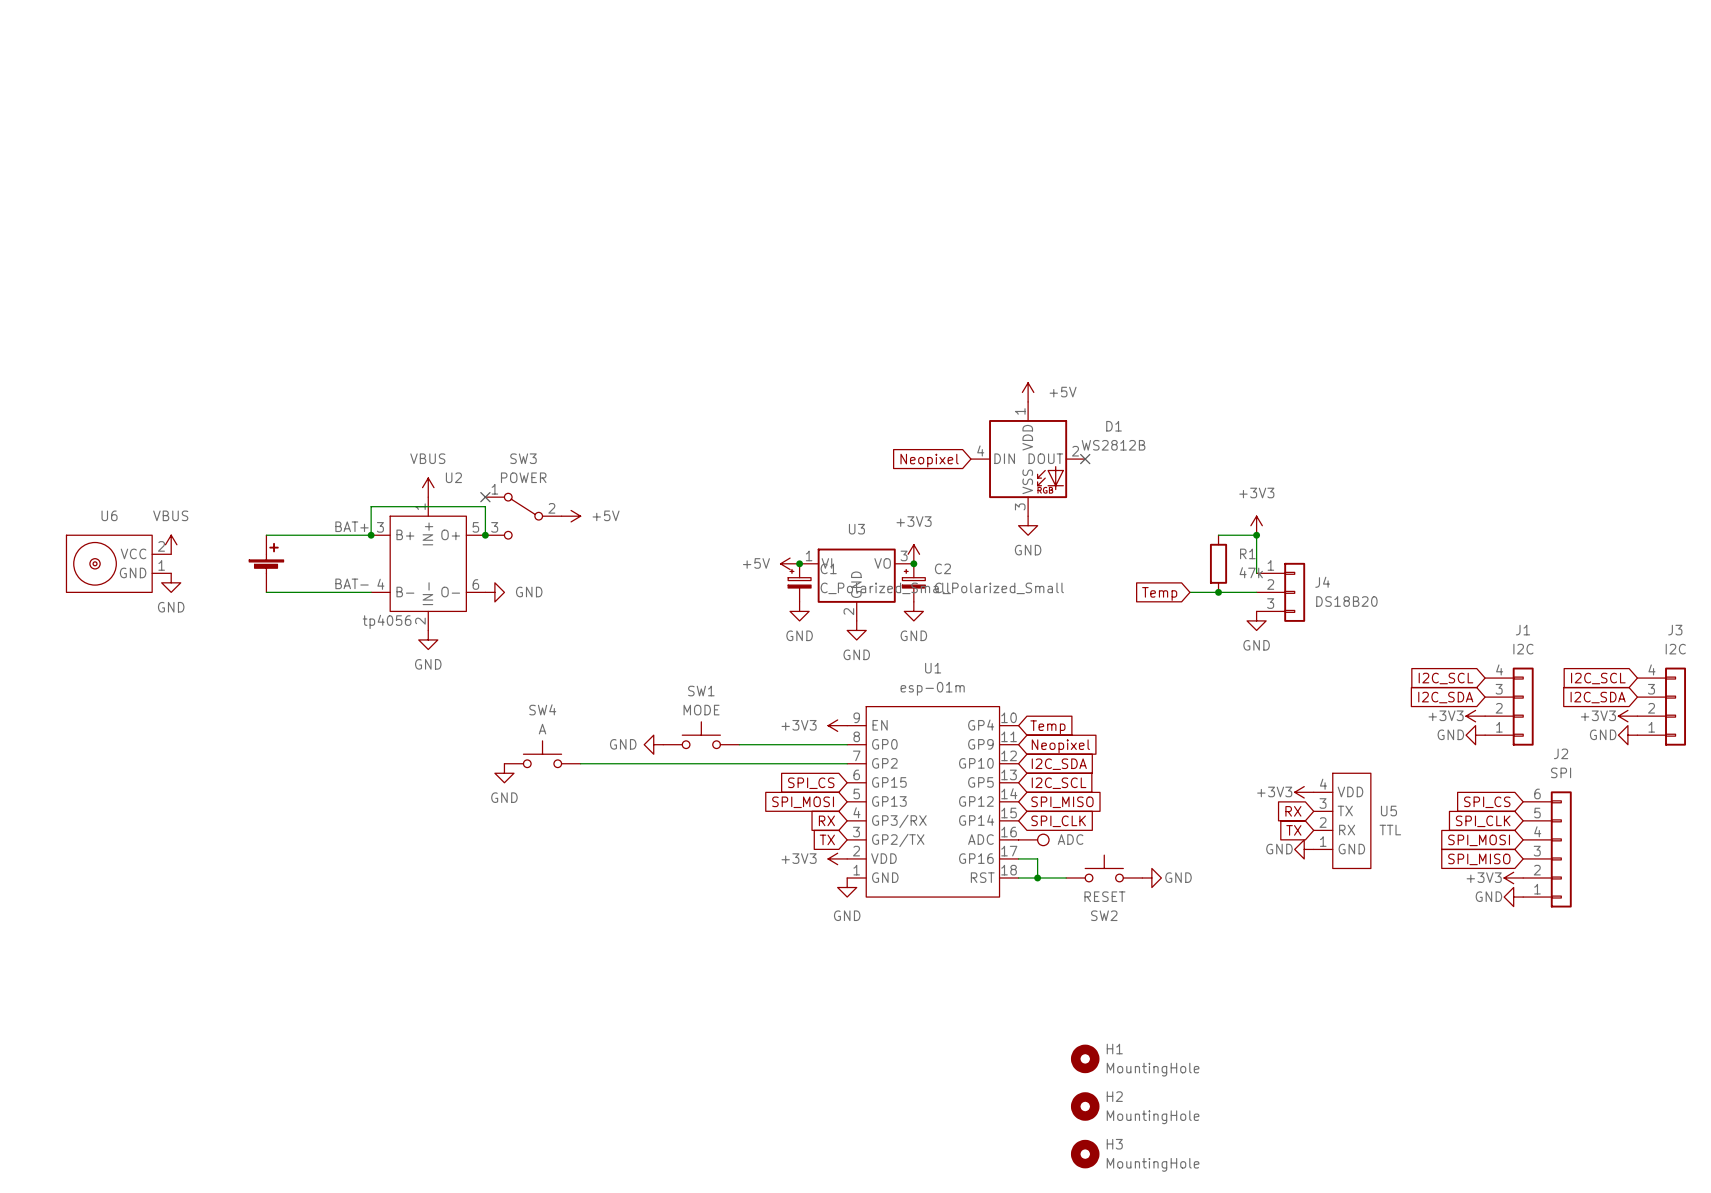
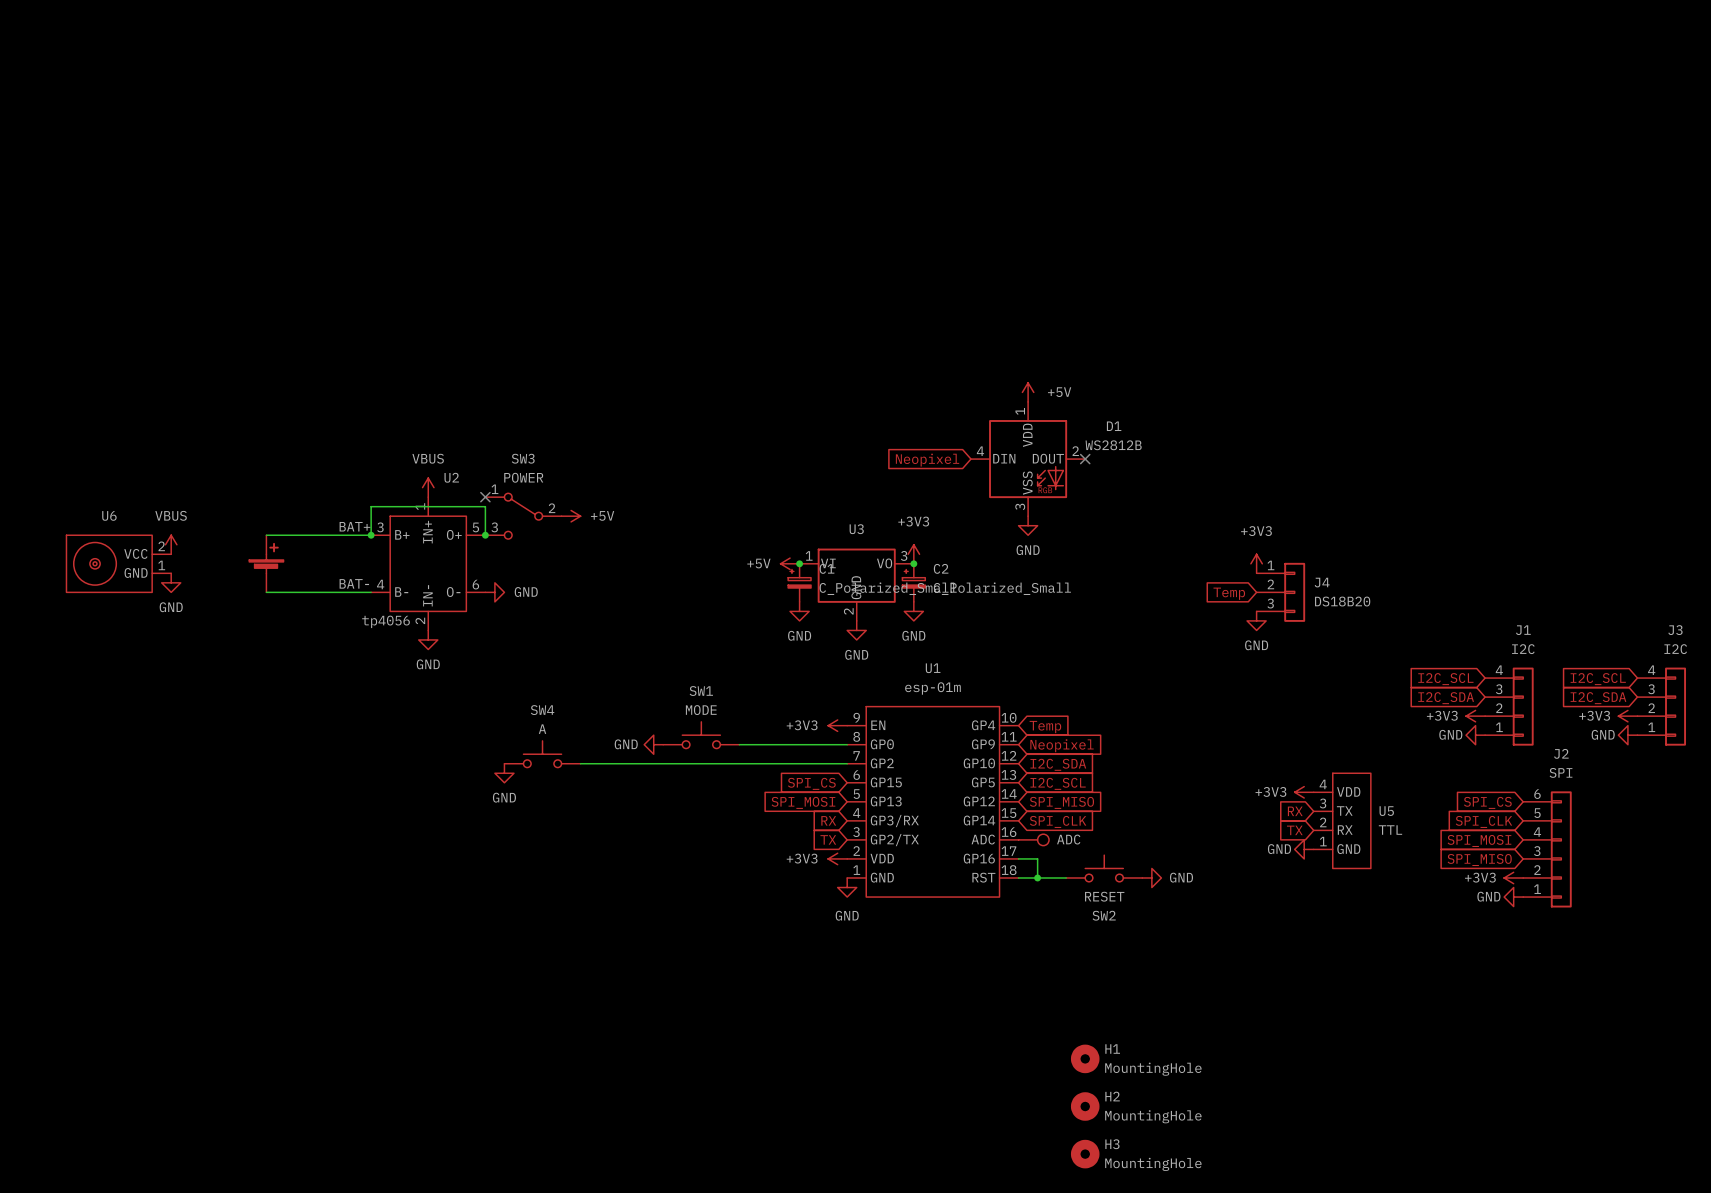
power symbol position: +3V3 (1256, 525) -> +3V3 (1256, 563)
wire: (1218, 535) (1256, 535) (1256, 573) -> none
junction: (1256, 535) -> none
R1: 47k (1218, 563) -> none
wire: (1189, 592) (1256, 592) -> none
junction: (1218, 592) -> none
global label position: Temp (1159, 593) -> Temp (1229, 593)

